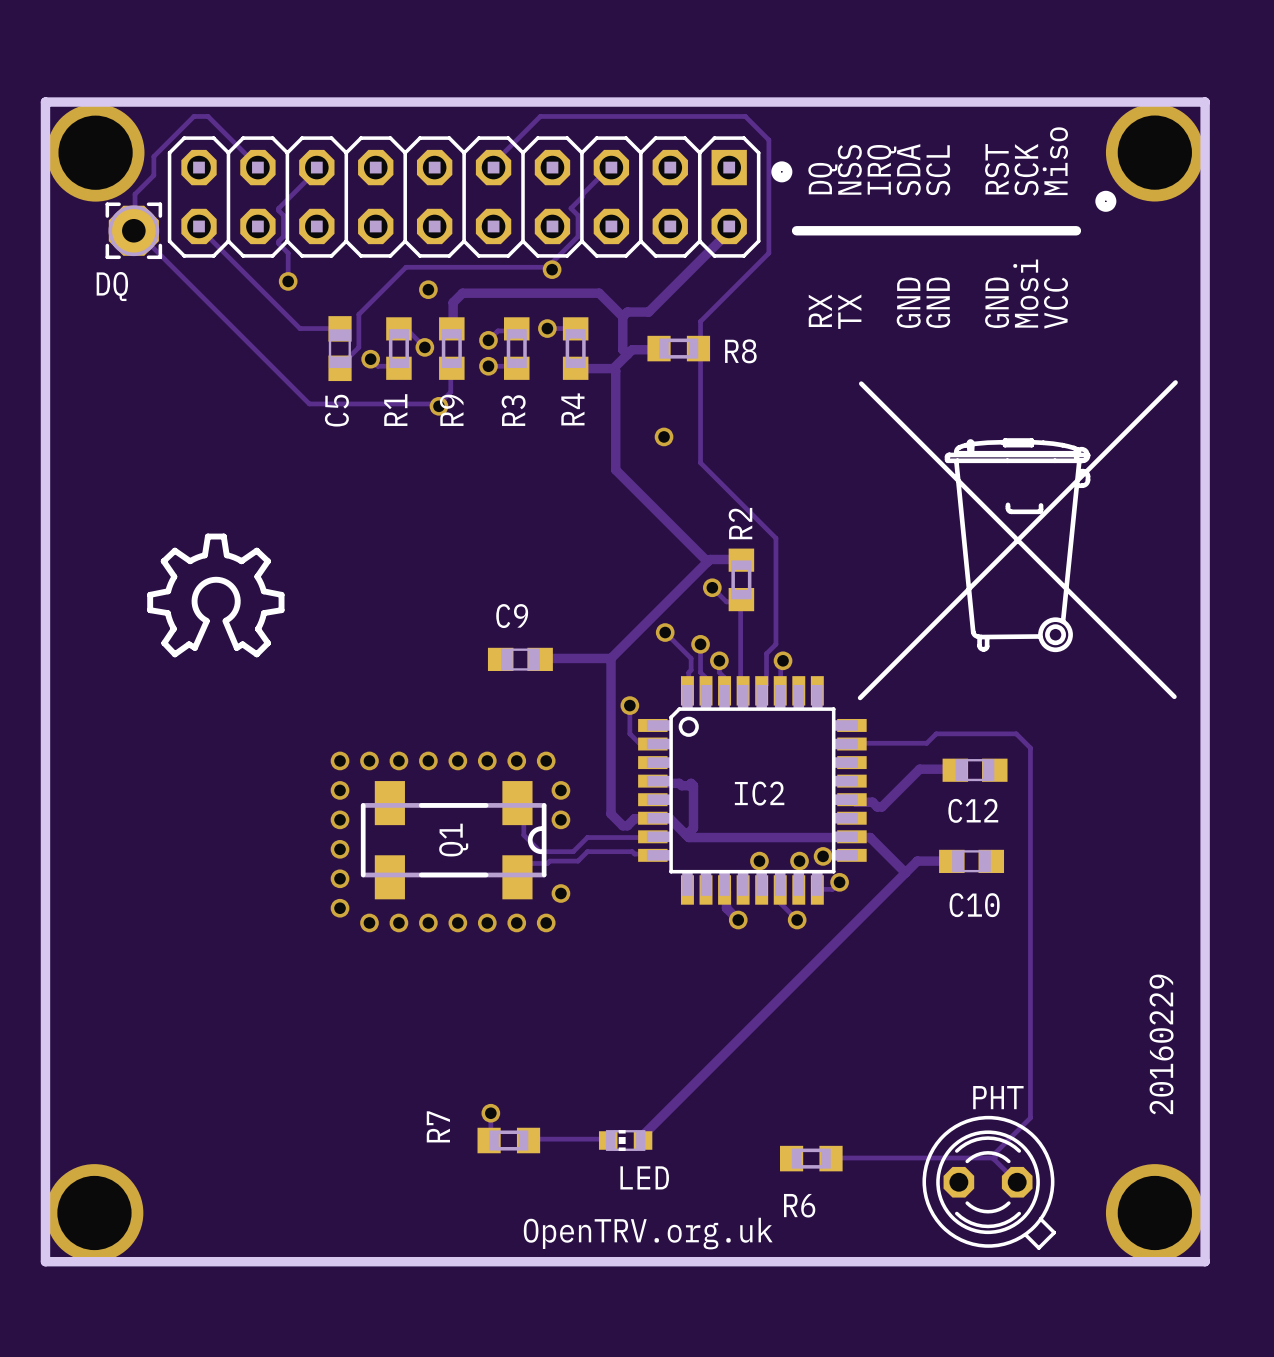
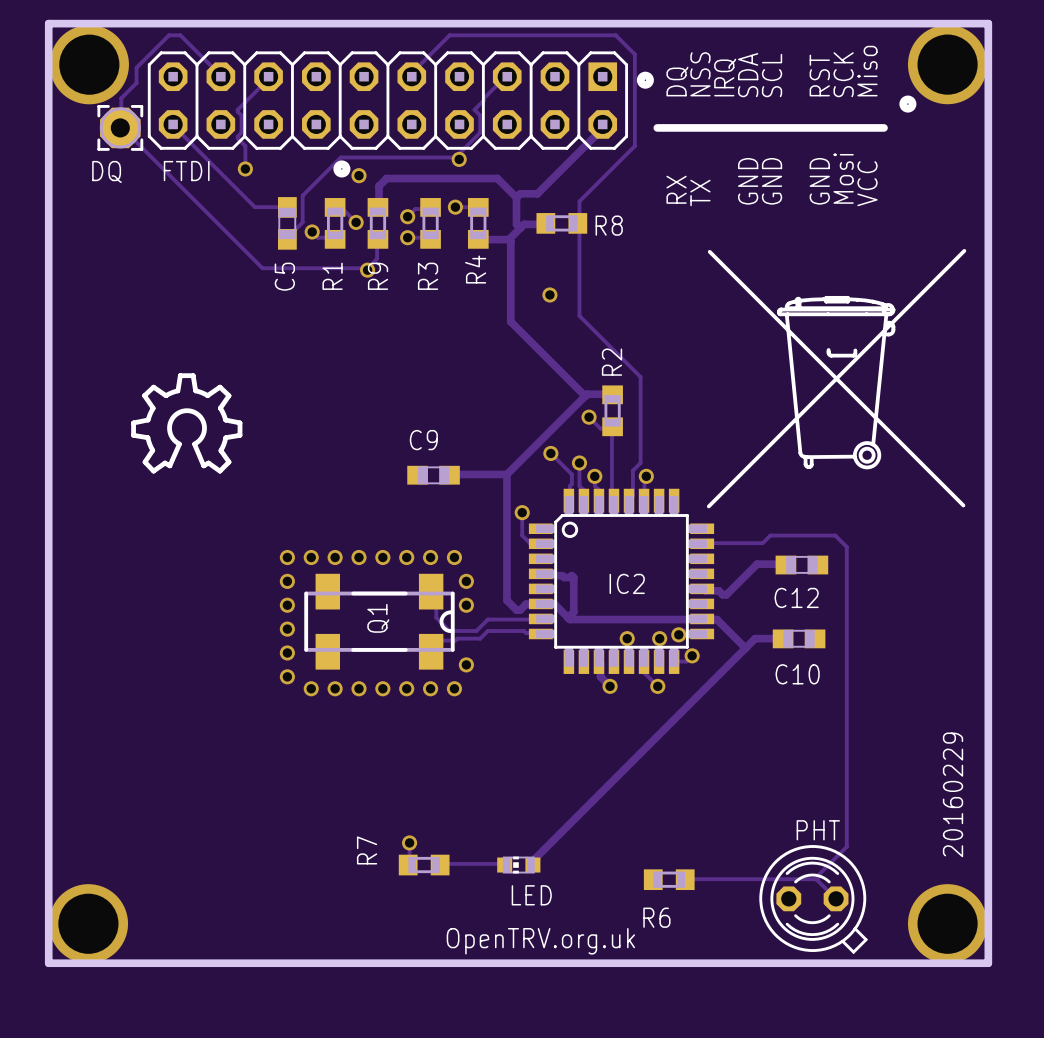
drawing: none -> [333, 160, 351, 178]
text: none -> FTDI (186, 171)

